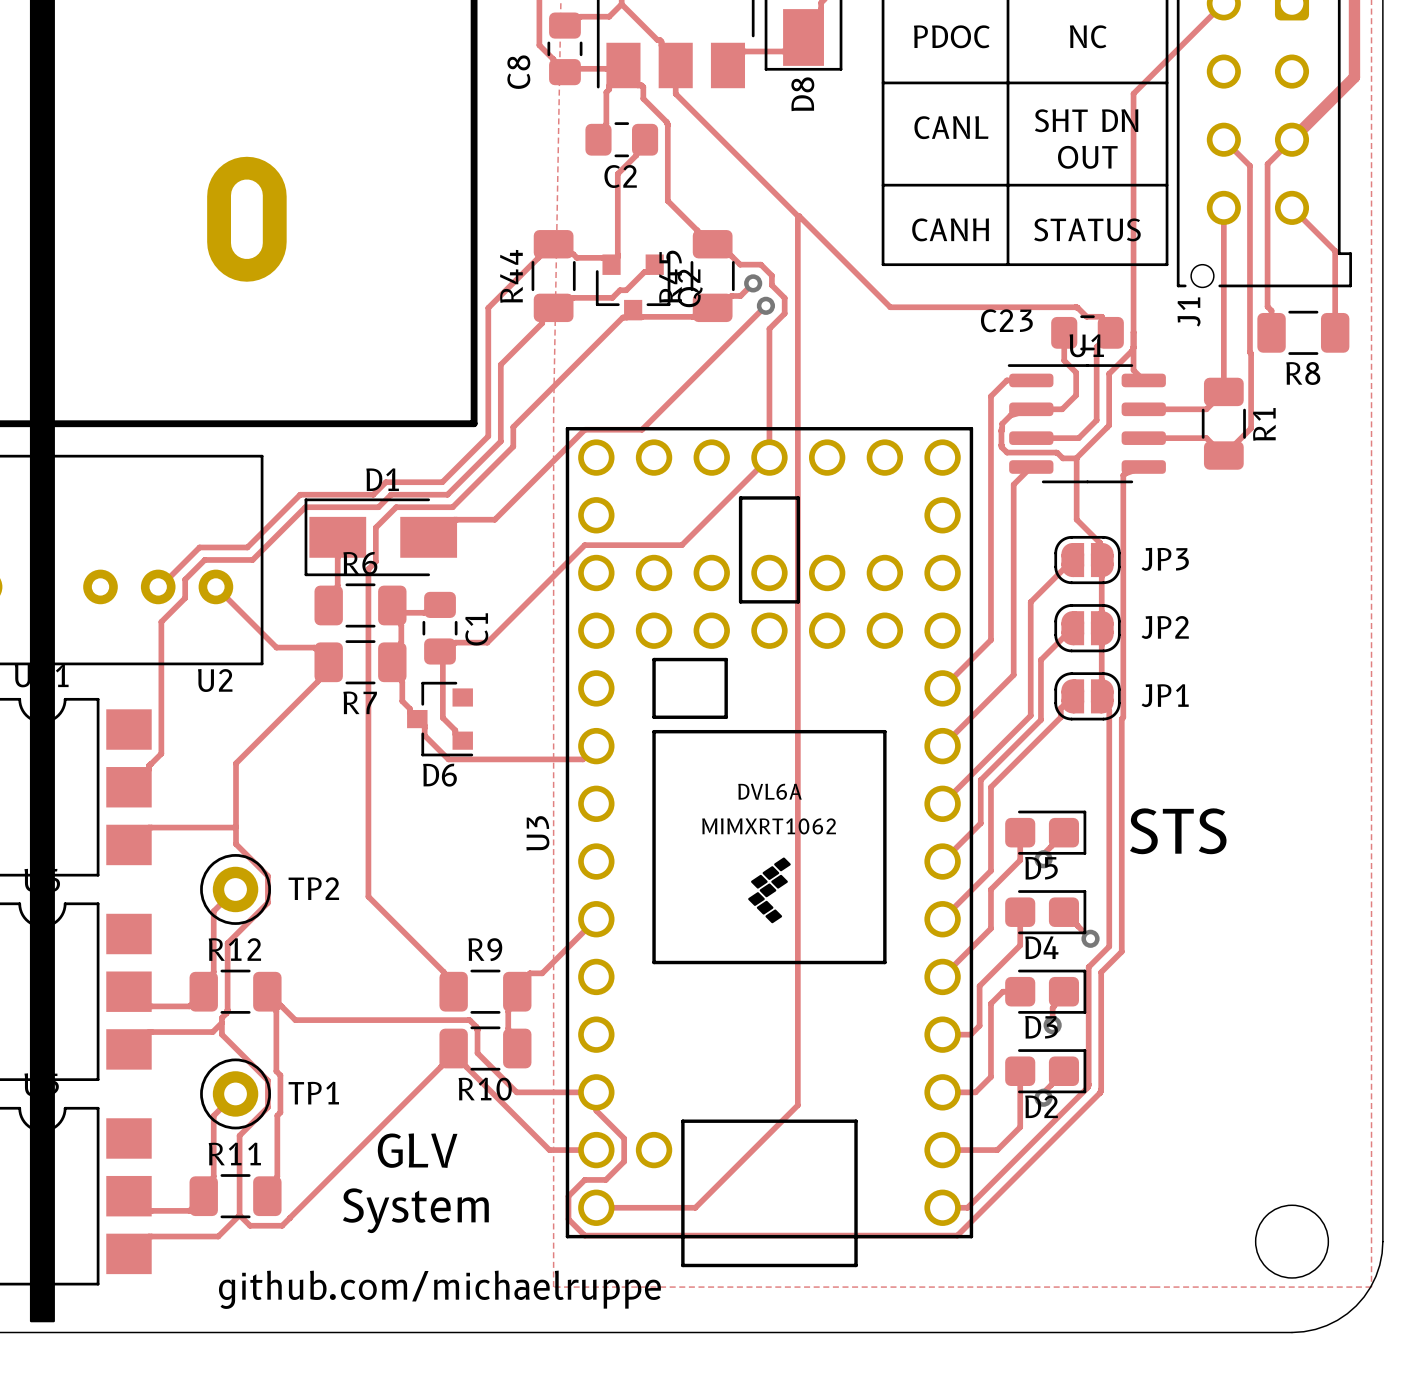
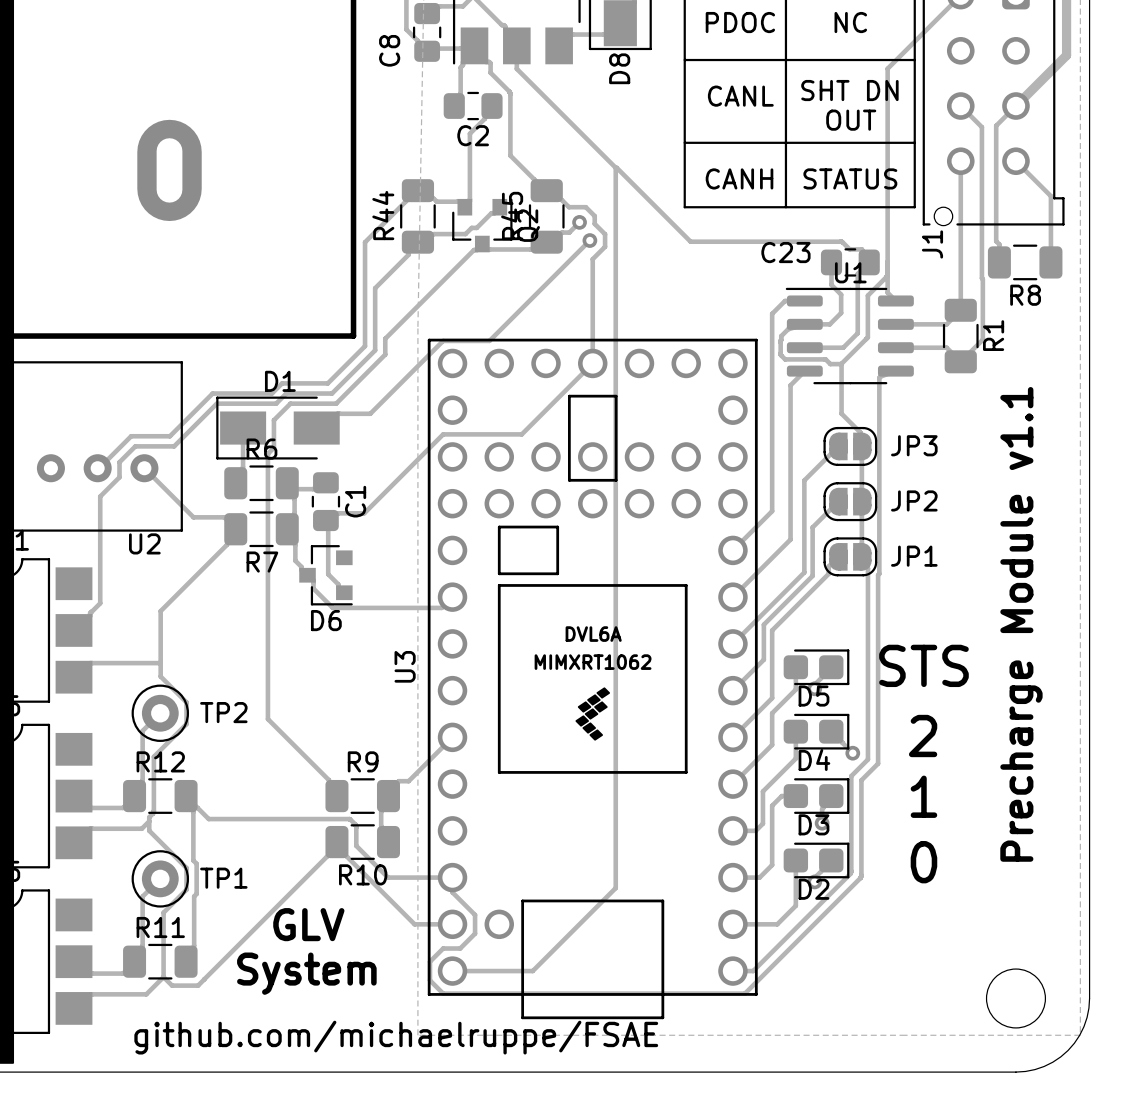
text: none -> Precharge Module v1.1 (1021, 624)
text: none -> 2 (923, 735)
text: none -> 1 (923, 796)
text: none -> 0 (923, 862)
text: github.com/michaelruppe (439, 1289) -> github.com/michaelruppe/FSAE (396, 1037)

